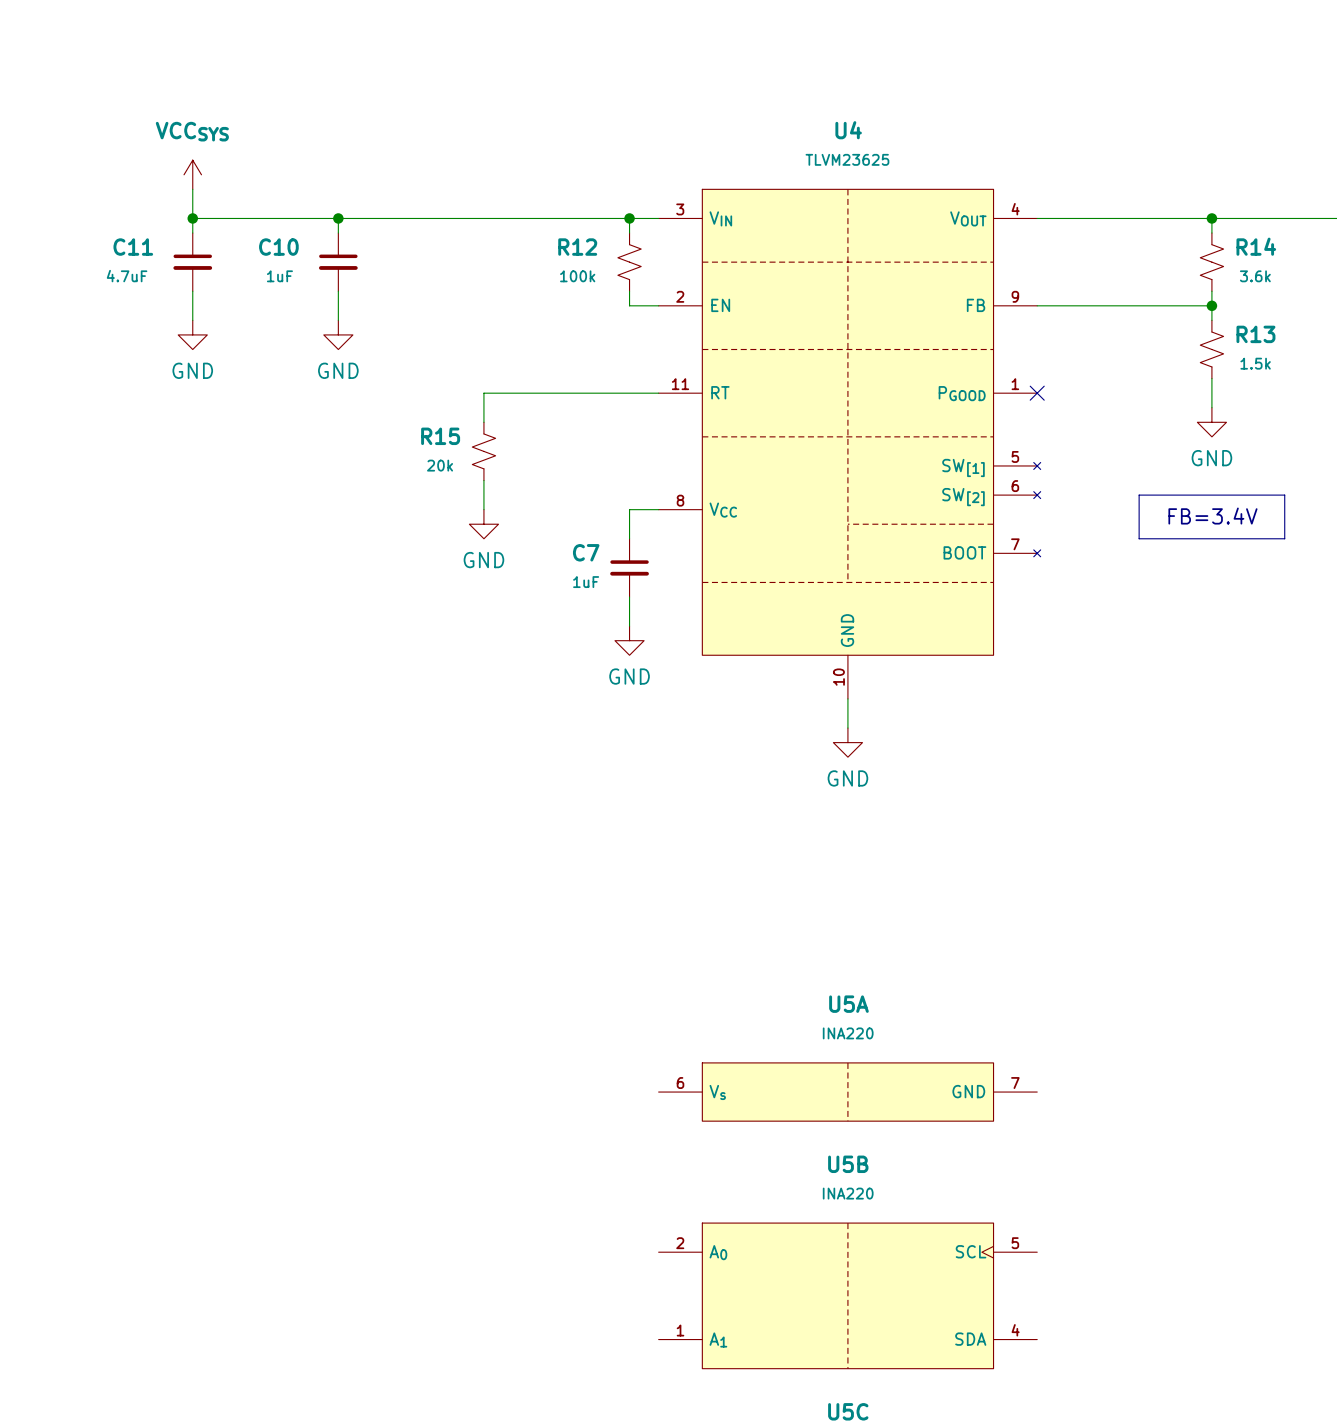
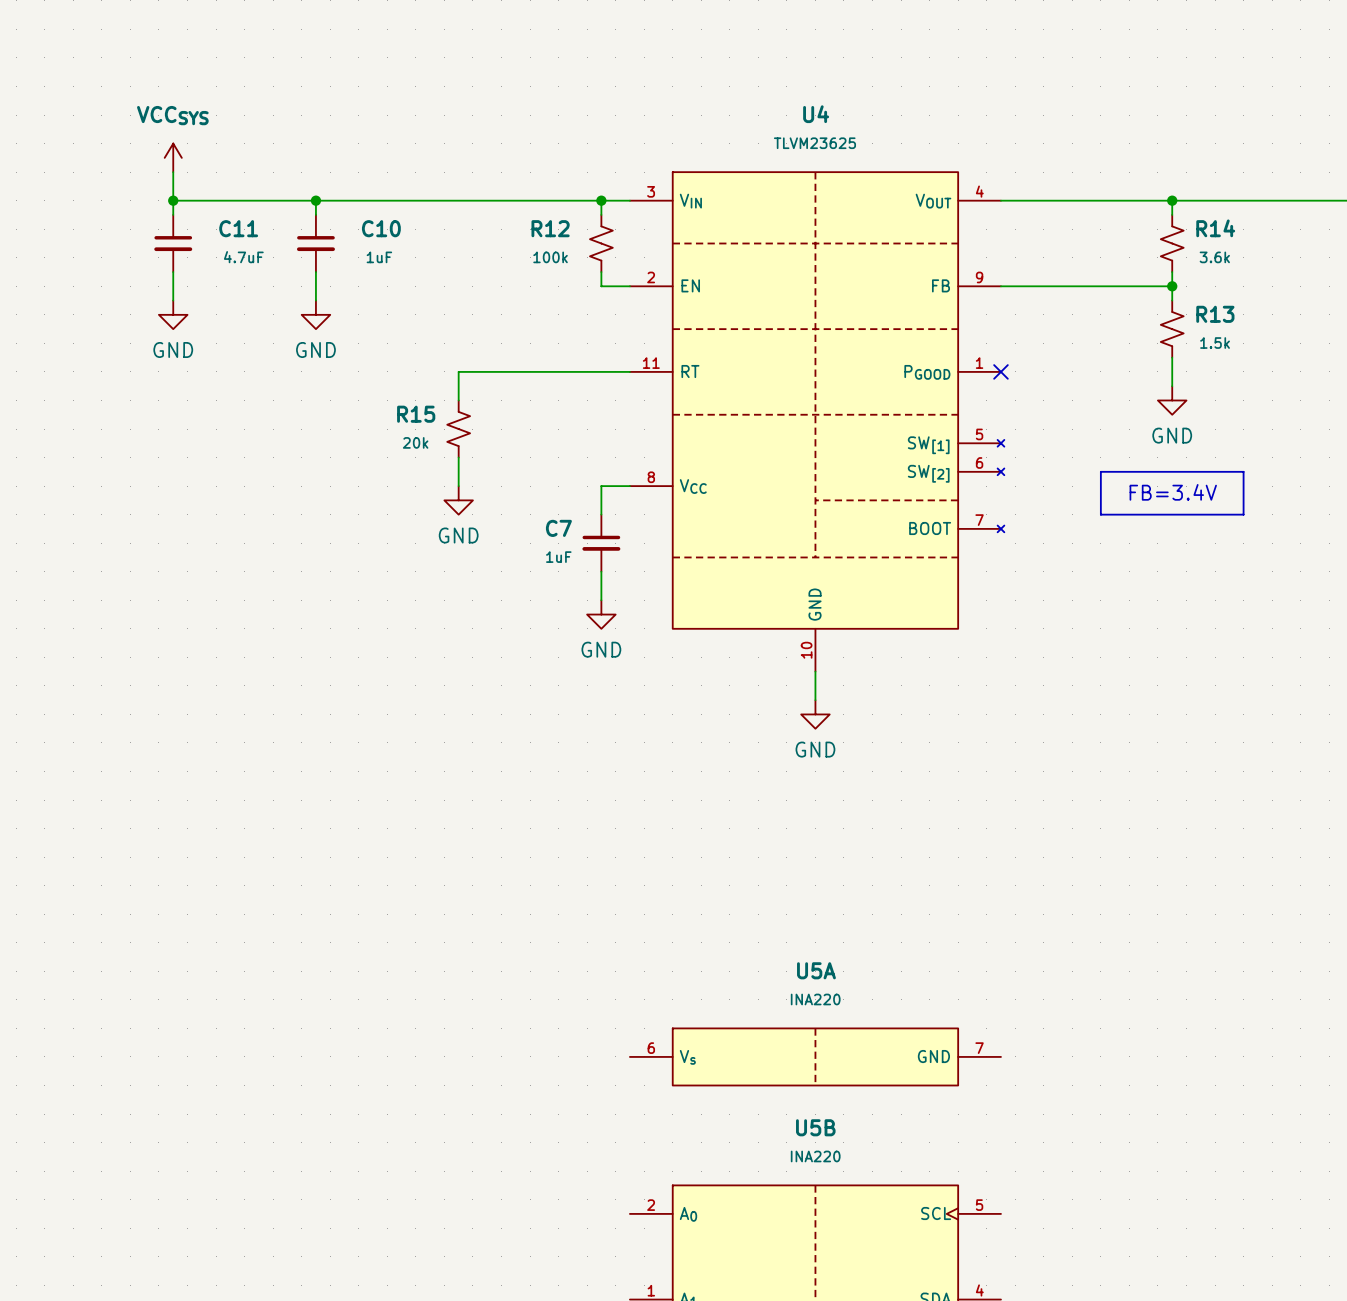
C11 name position: C11 (133, 247) -> C11 (238, 228)
C10 name position: C10 (278, 247) -> C10 (381, 228)
C11 value position: 4.7uF (127, 276) -> 4.7uF (243, 257)
C10 value position: 1uF (279, 276) -> 1uF (379, 257)

